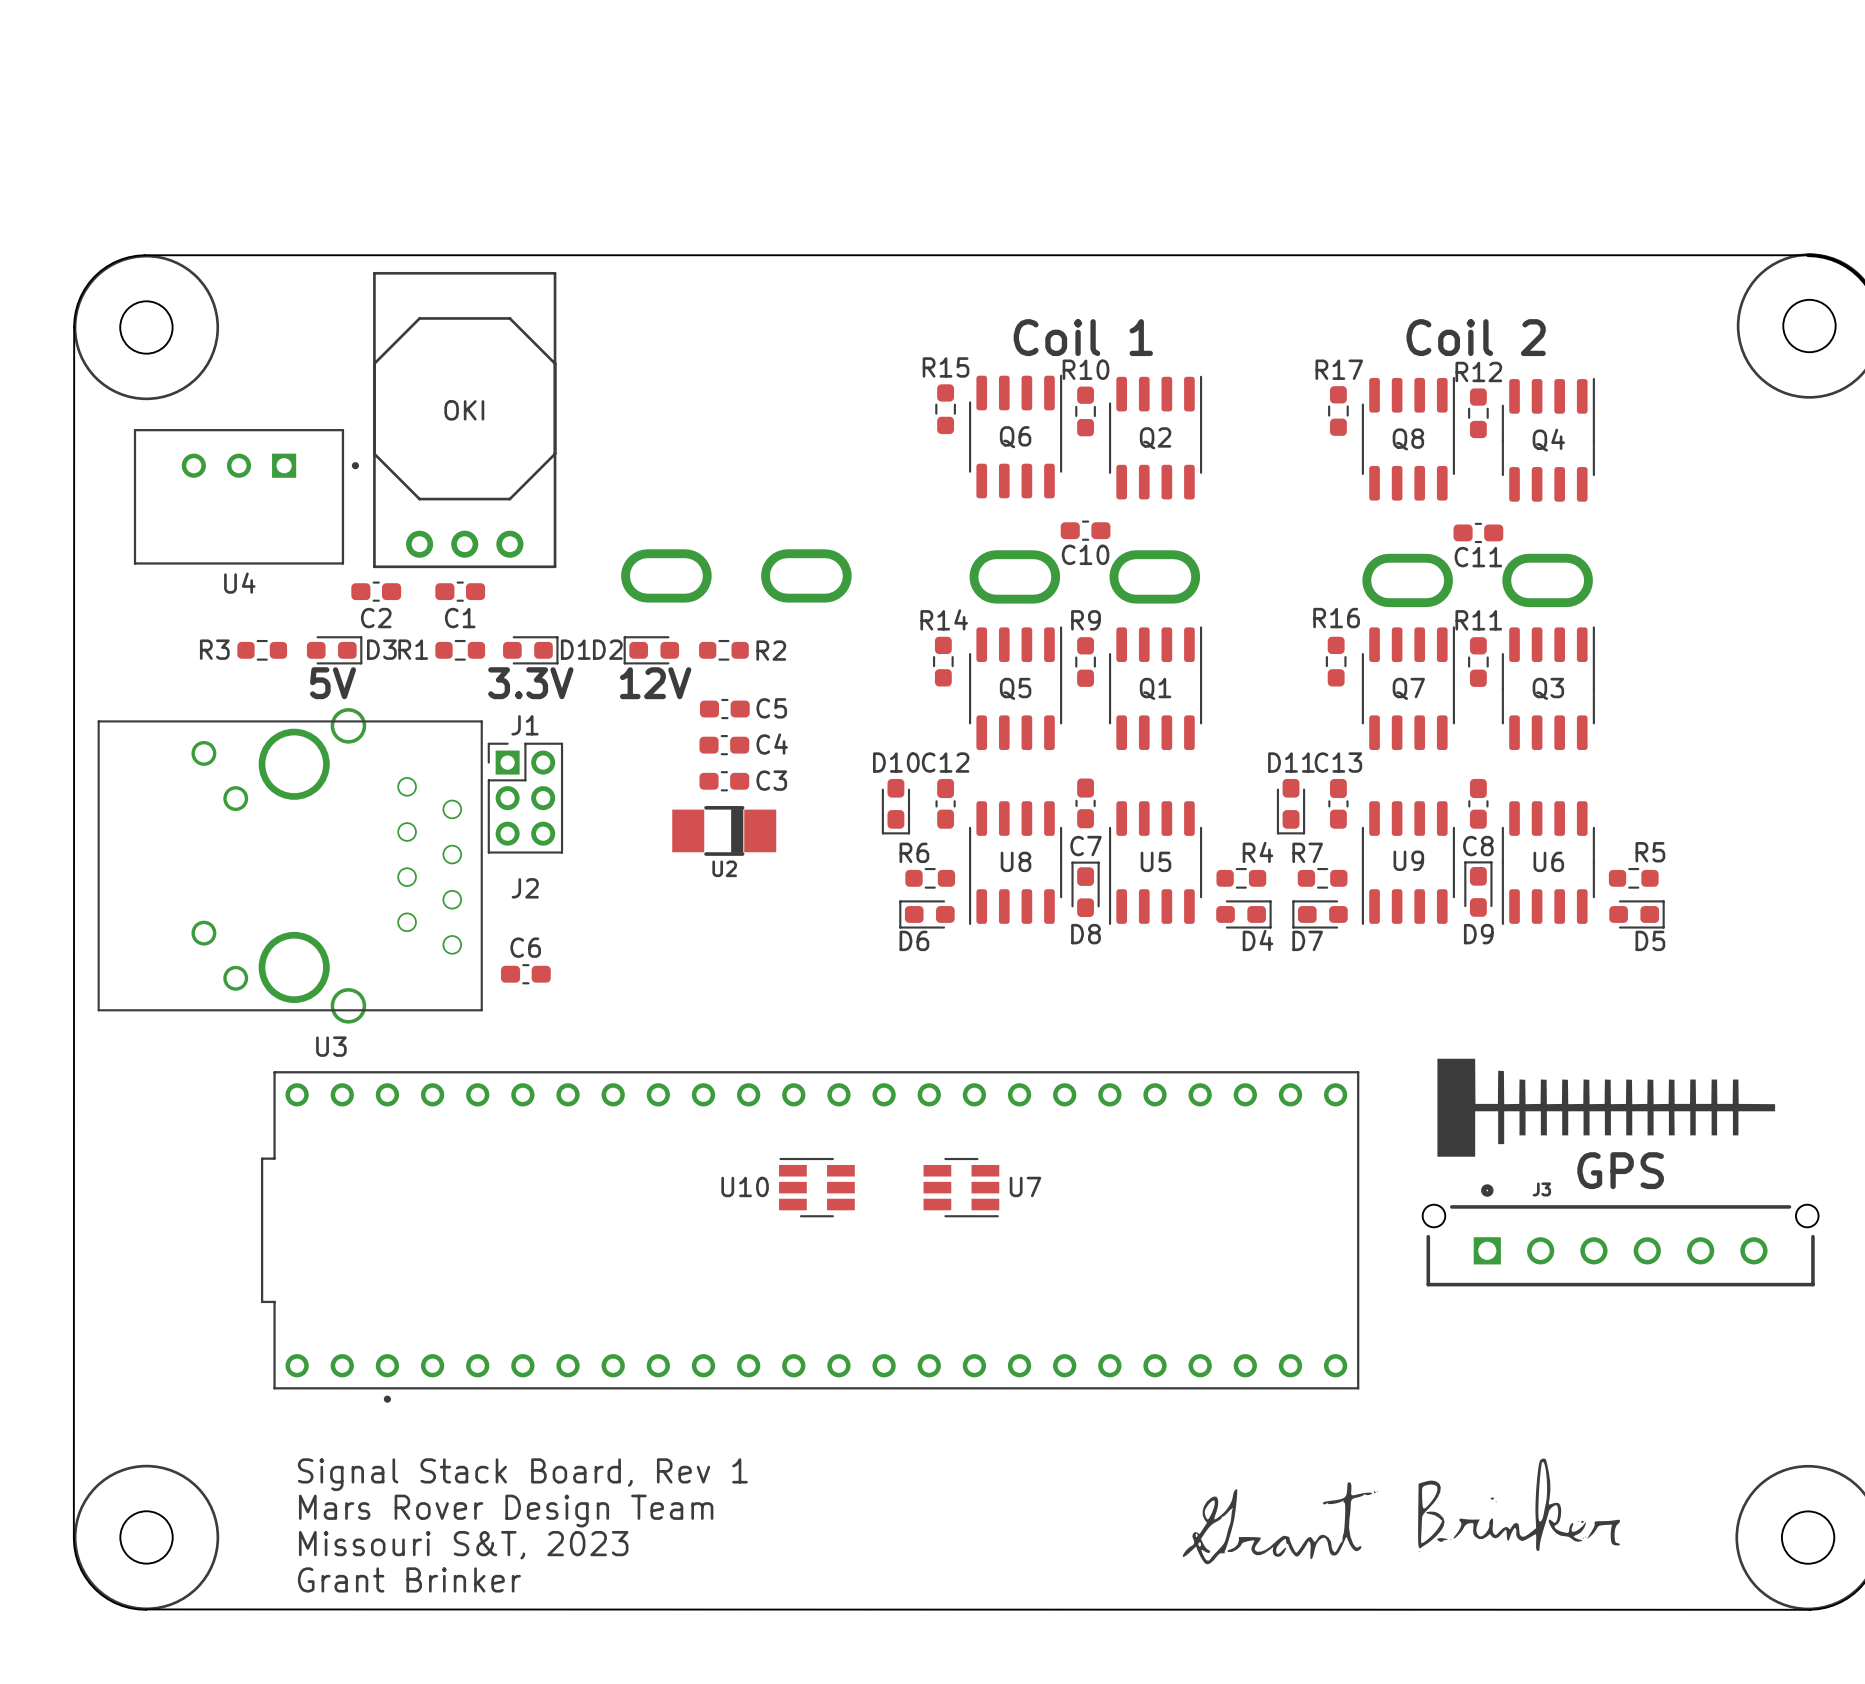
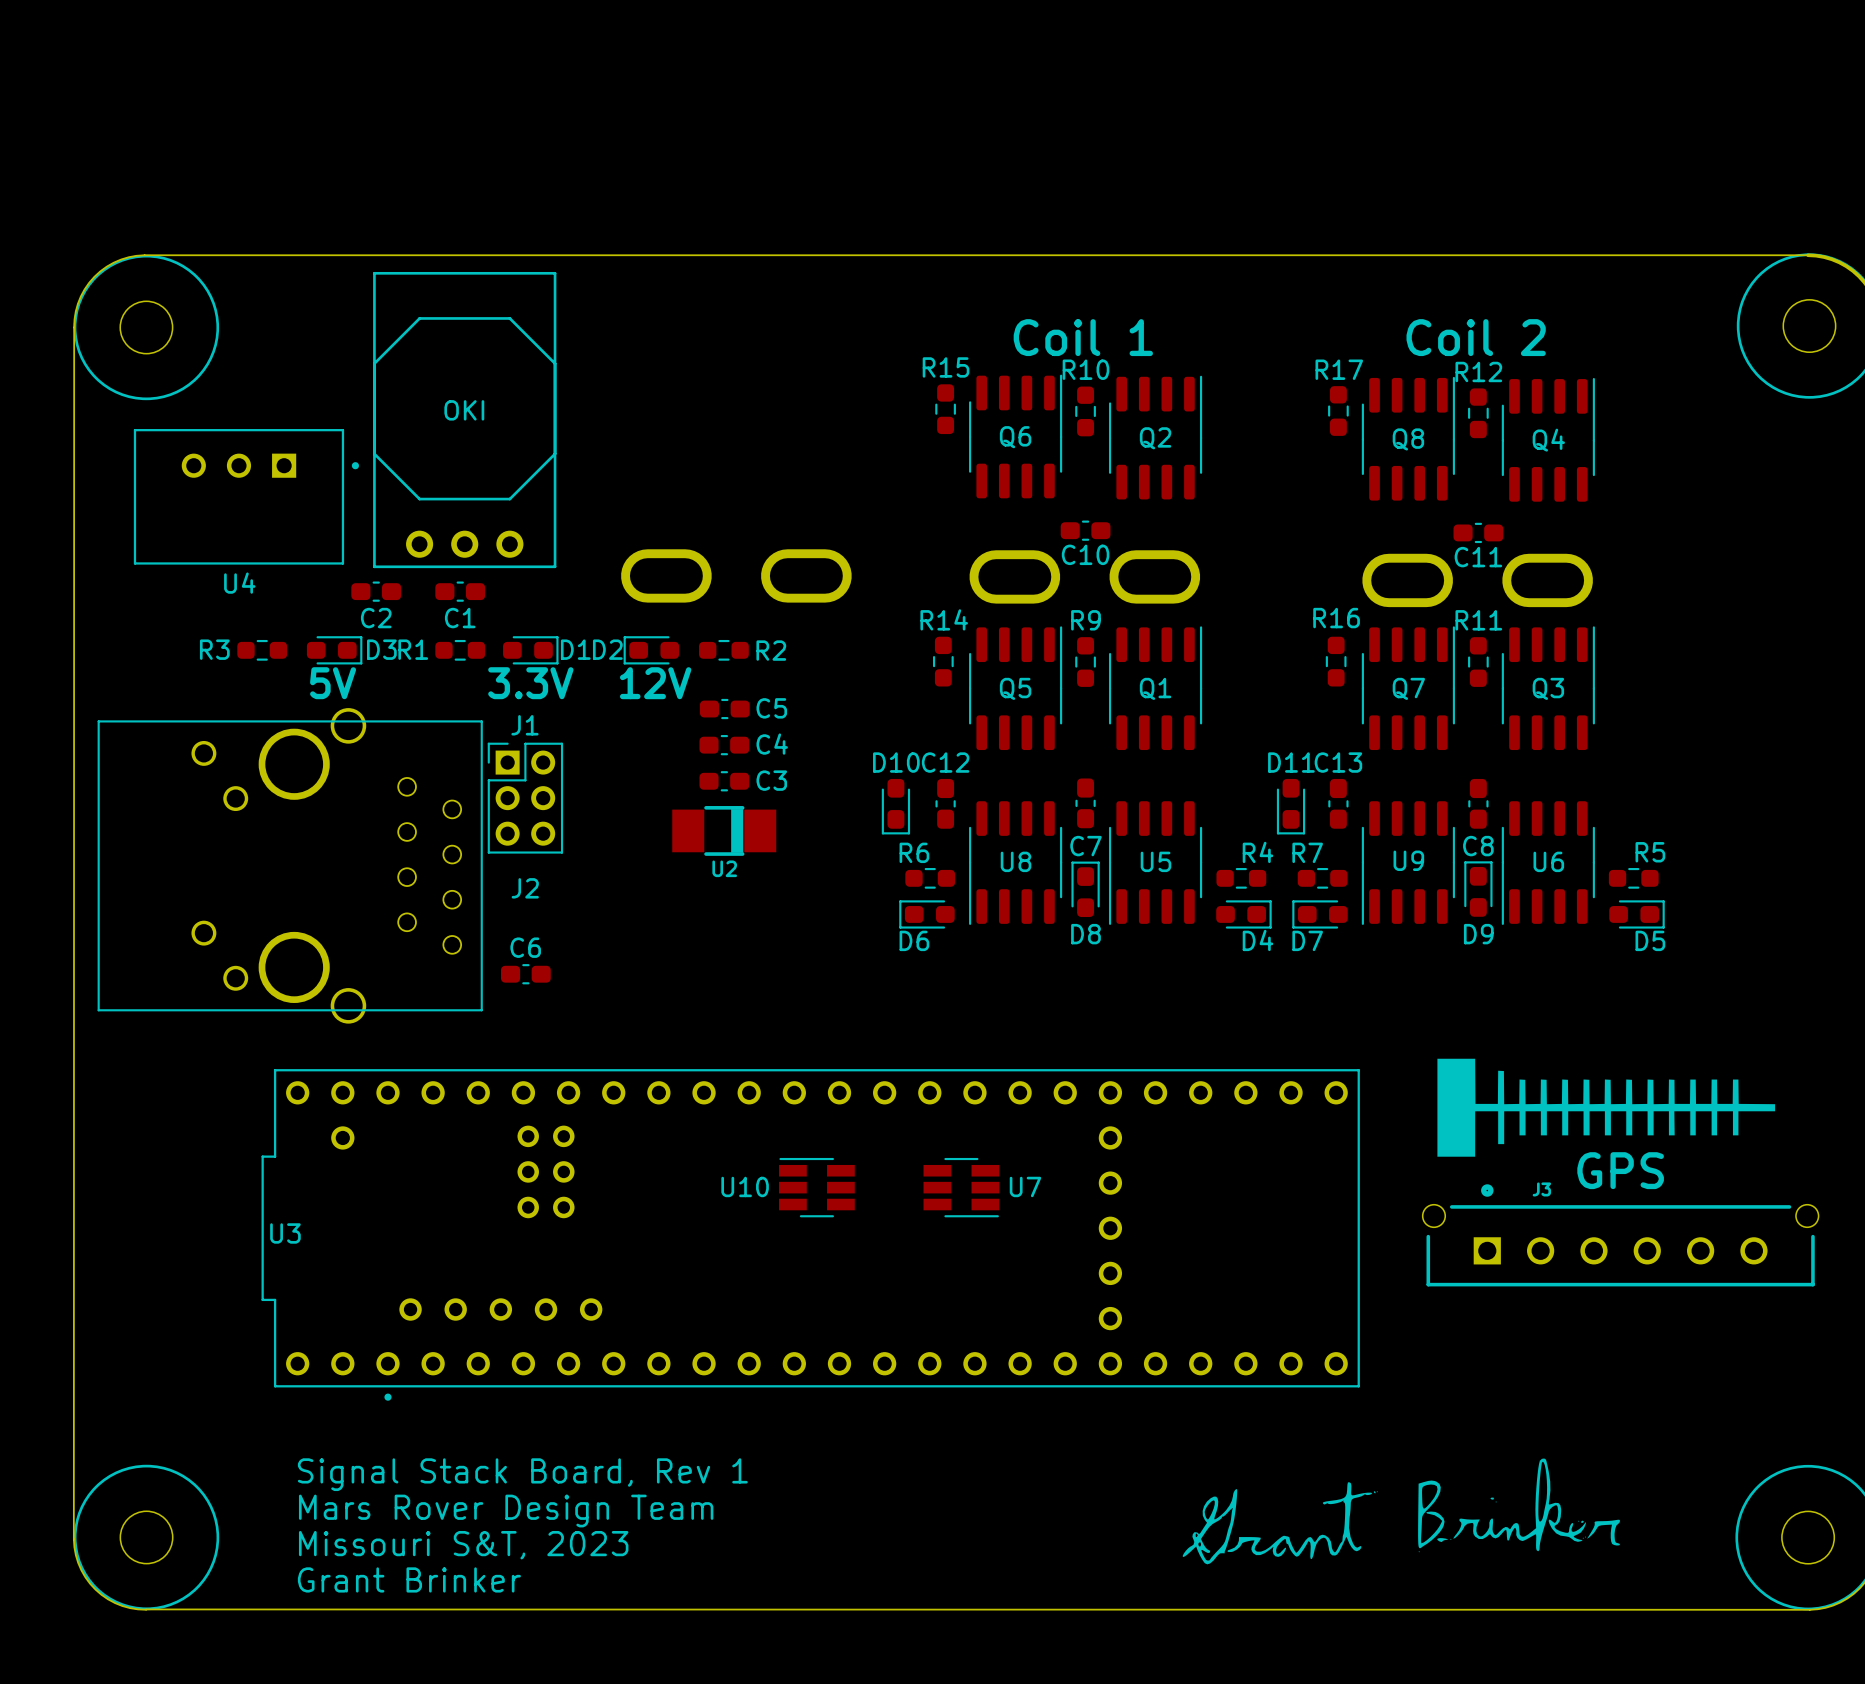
U3 name position: U3 (331, 1046) -> U3 (285, 1233)
U3 footprint: [260, 1071, 1360, 1403] -> [261, 1069, 1360, 1401]

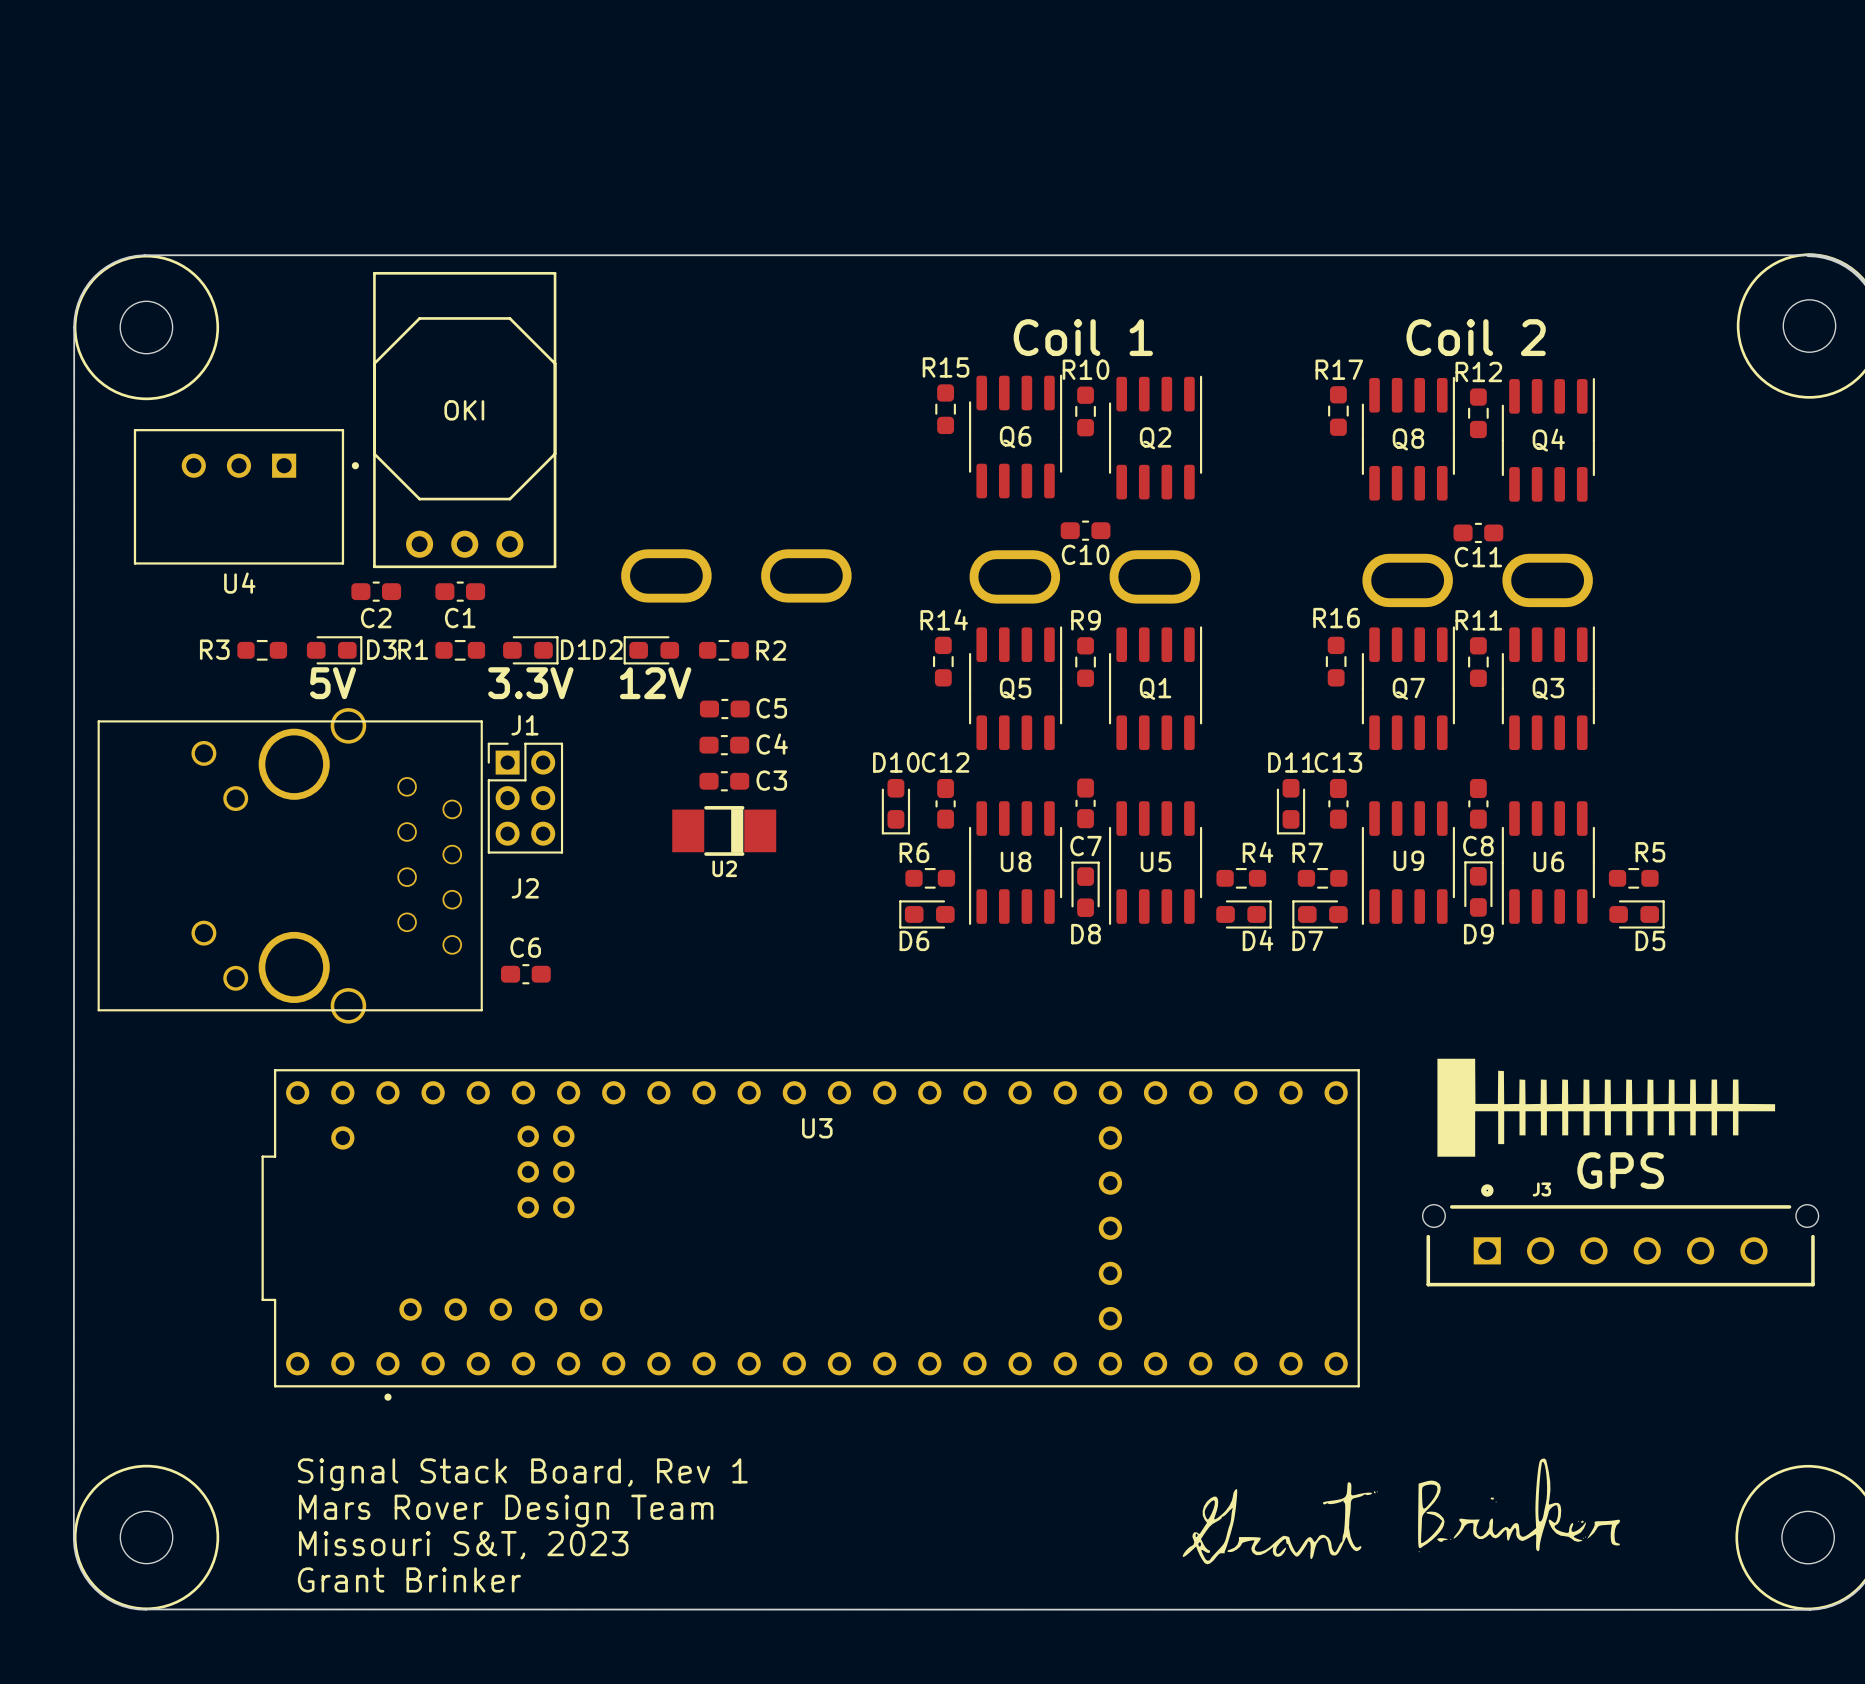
U10: (816, 1187) -> none
U7: (961, 1187) -> none
U3 name position: U3 (285, 1233) -> U3 (817, 1128)

